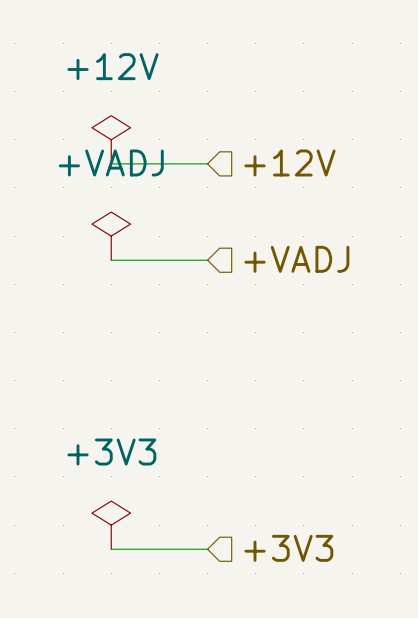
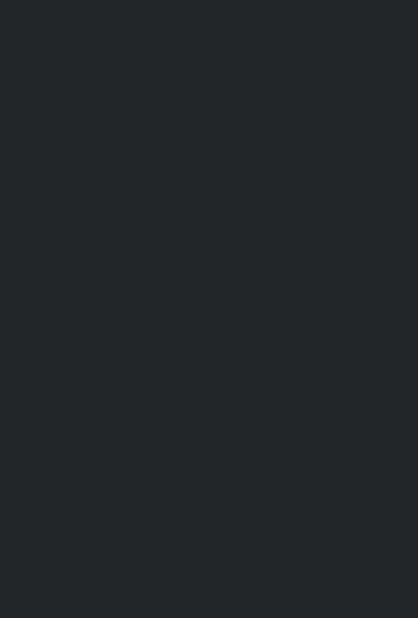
power symbol: +12V (111, 139) -> none
hierarchical label: +12V (289, 162) -> none
wire: (111, 163) (207, 163) -> none
power symbol: +VADJ (111, 236) -> none
hierarchical label: +VADJ (296, 259) -> none
wire: (111, 260) (207, 260) -> none
power symbol: +3V3 (111, 525) -> none
hierarchical label: +3V3 (288, 548) -> none
wire: (111, 549) (207, 549) -> none

